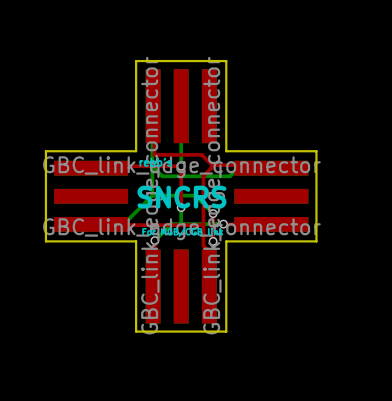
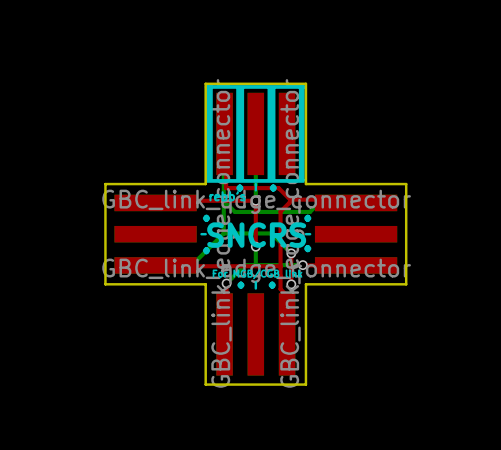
drawing: none -> [204, 85, 305, 183]
line: none -> (255, 184) (255, 190)
text: none -> . (239, 188)
text: none -> . (273, 188)
text: none -> . (206, 218)
text: none -> . (307, 218)
line: none -> (201, 234) (205, 234)
line: none -> (305, 234) (310, 234)
text: none -> . (307, 248)
text: none -> . (206, 250)
line: none -> (255, 282) (255, 288)
text: none -> . (240, 285)
text: none -> . (272, 285)

